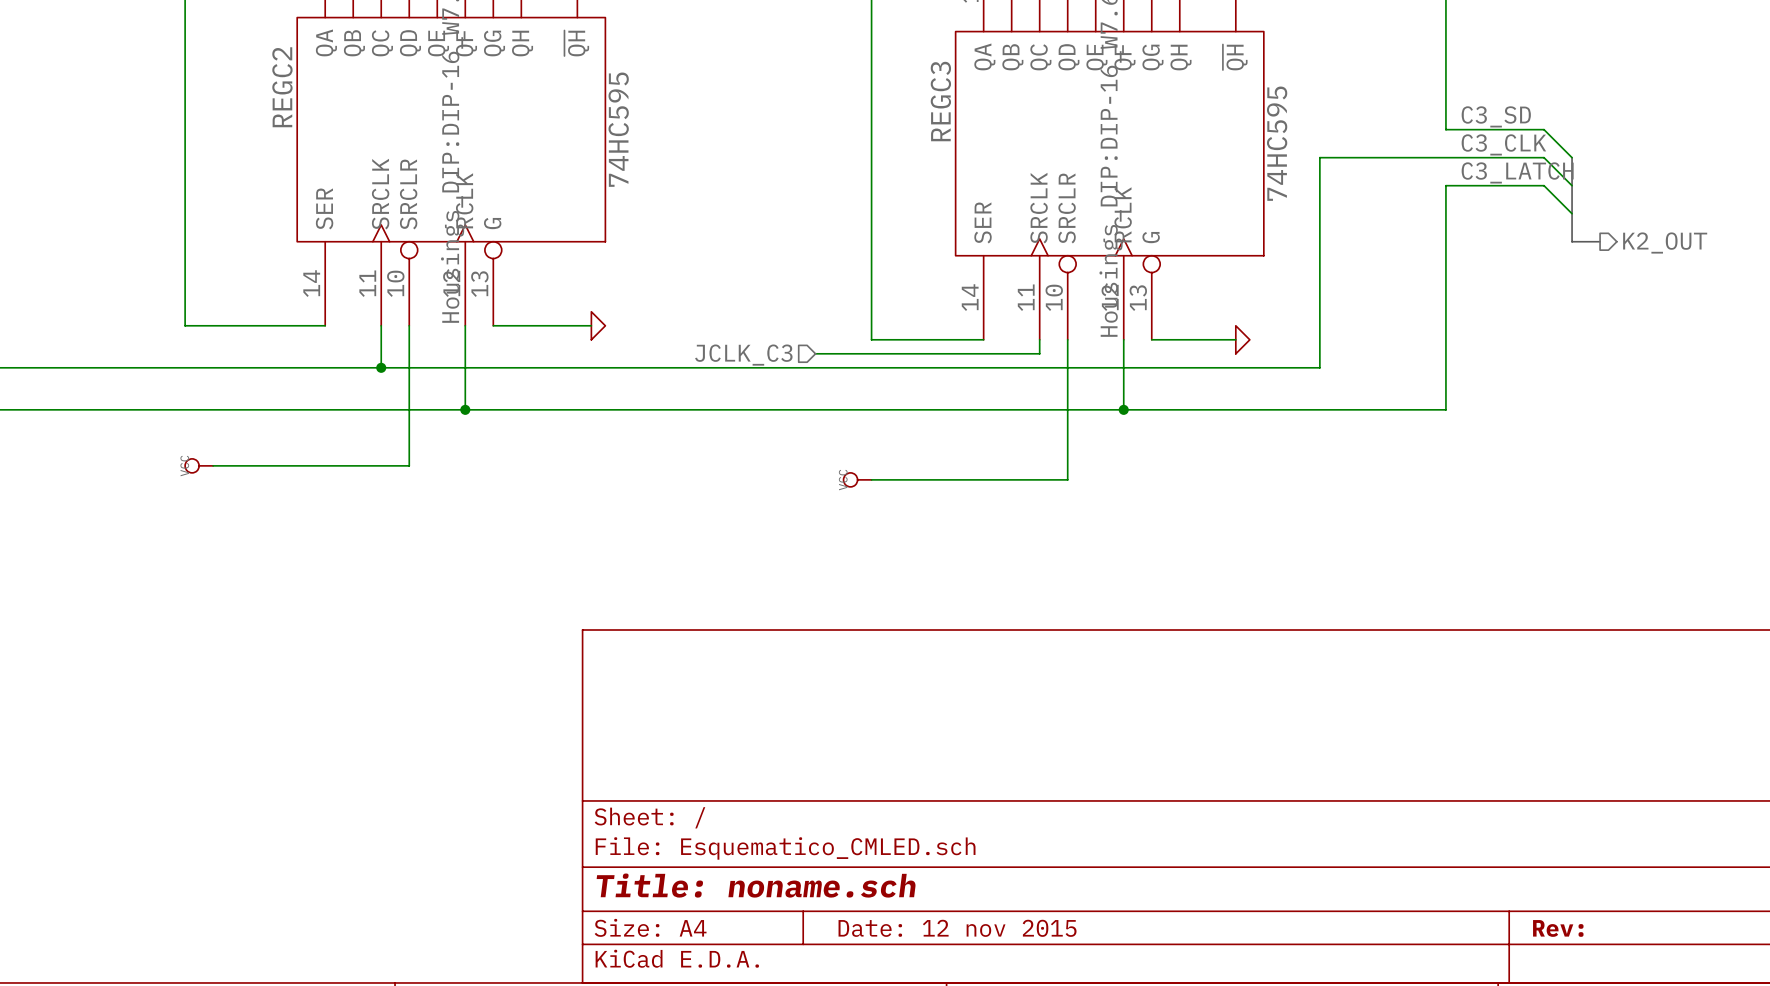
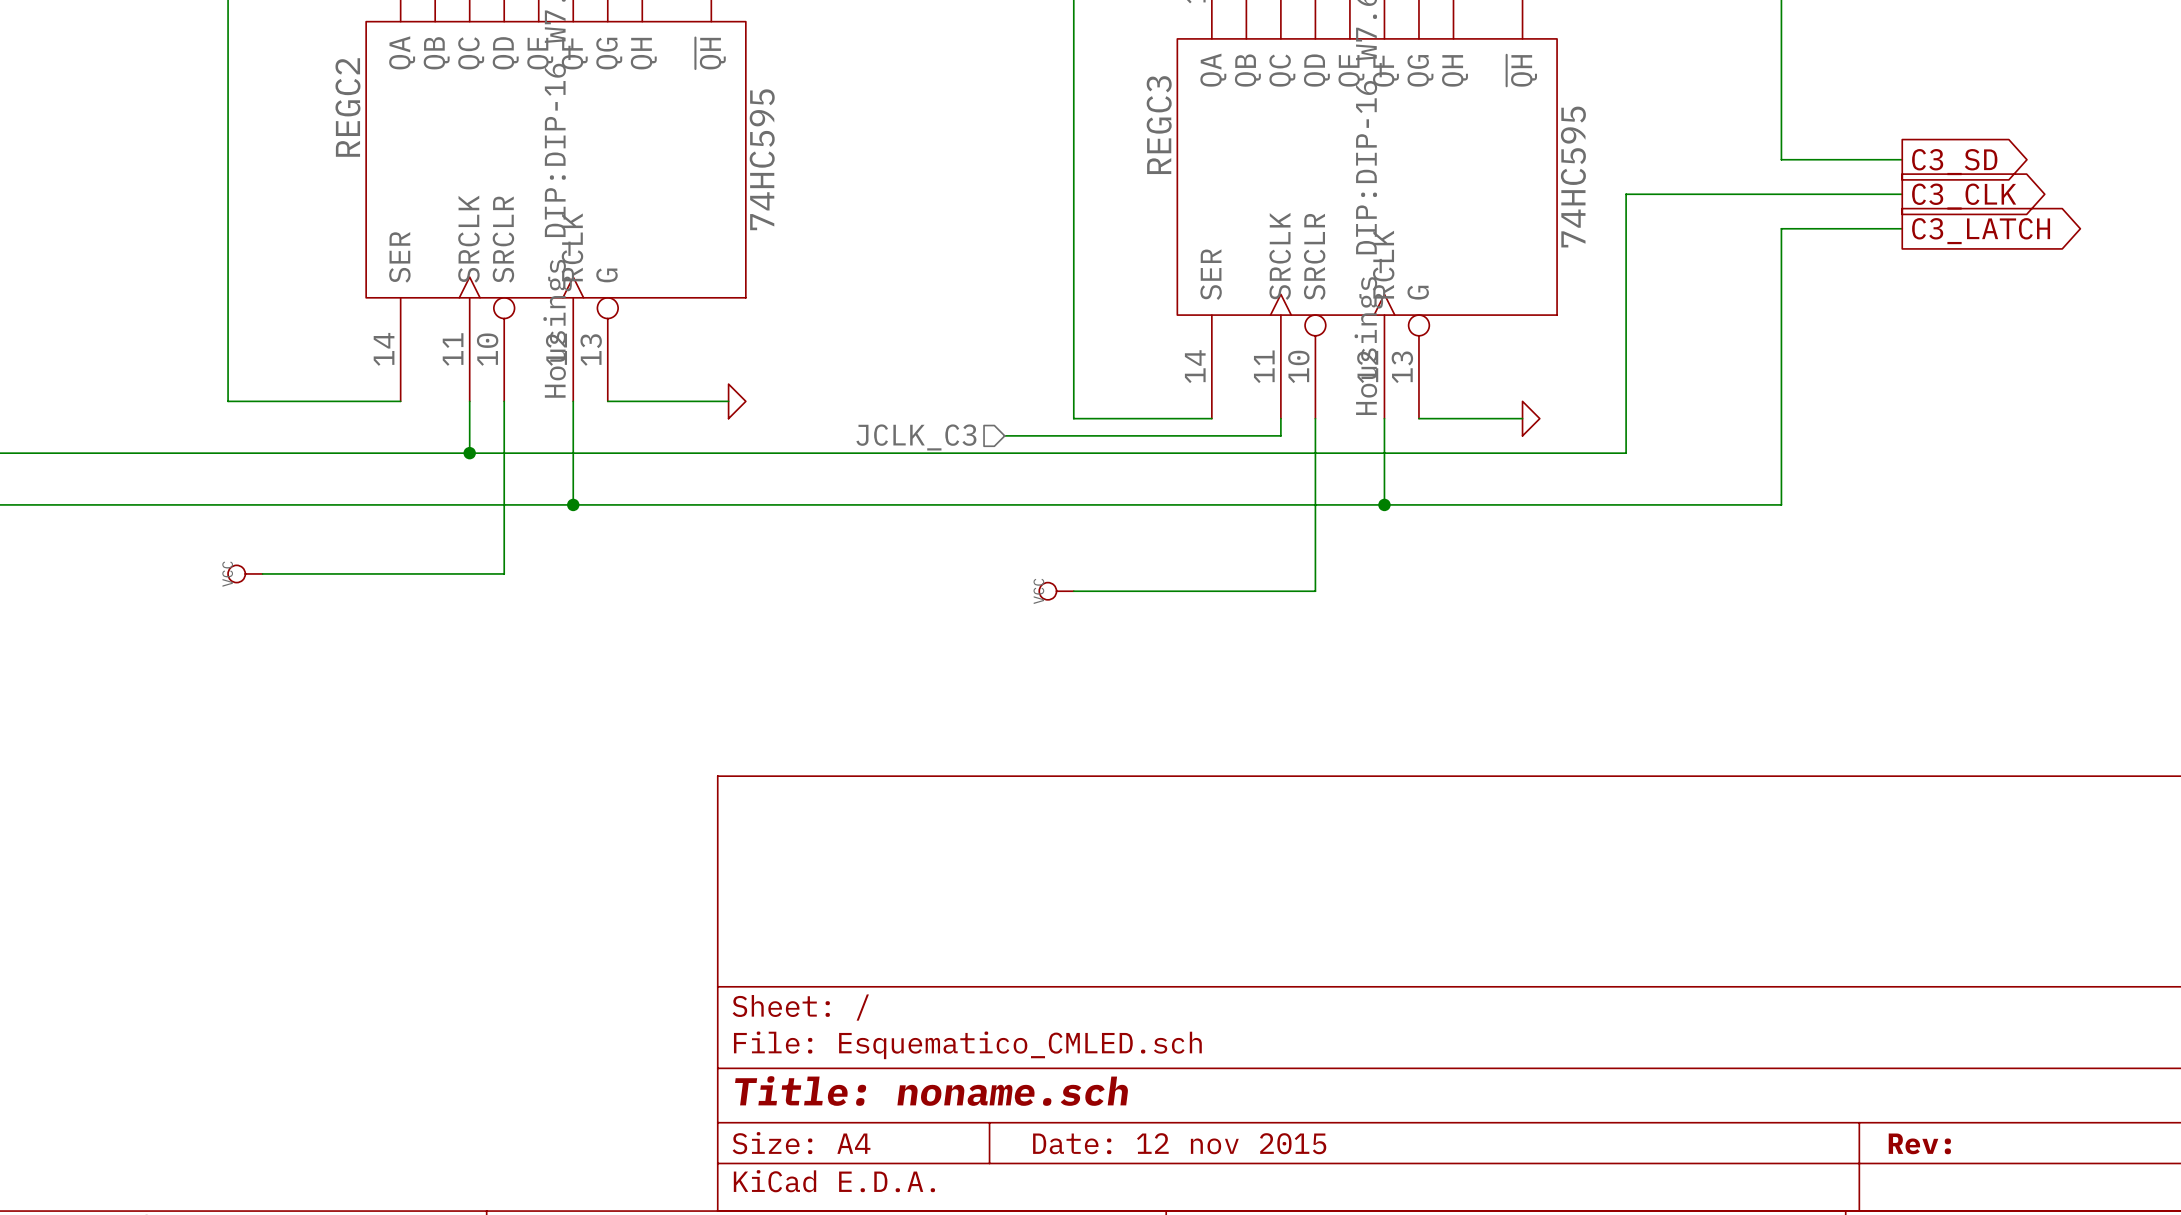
label: C3_SD (1496, 116) -> none
wire: (1544, 129) (1572, 157) -> none
global label: none -> C3_SD (1954, 162)
label: C3_CLK (1503, 144) -> none
wire: (1544, 157) (1572, 185) -> none
bus: (1572, 157) (1572, 241) (1600, 241) -> none
global label: none -> C3_CLK (1964, 196)
label: C3_LATCH (1517, 172) -> none
wire: (1544, 185) (1572, 213) -> none
global label: none -> C3_LATCH (1981, 231)
hierarchical label: K2_OUT (1665, 242) -> none

